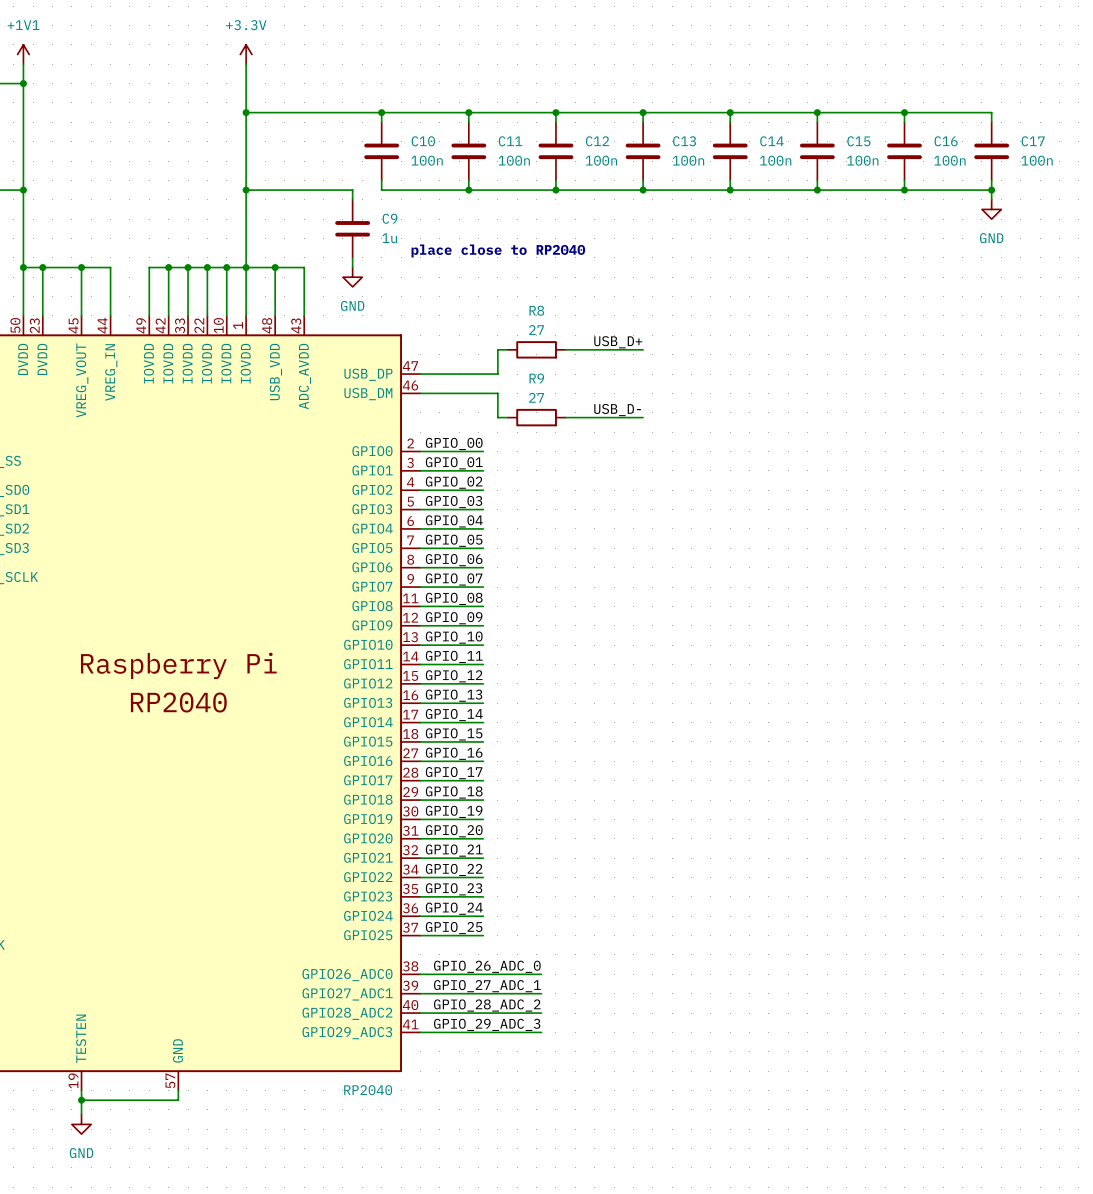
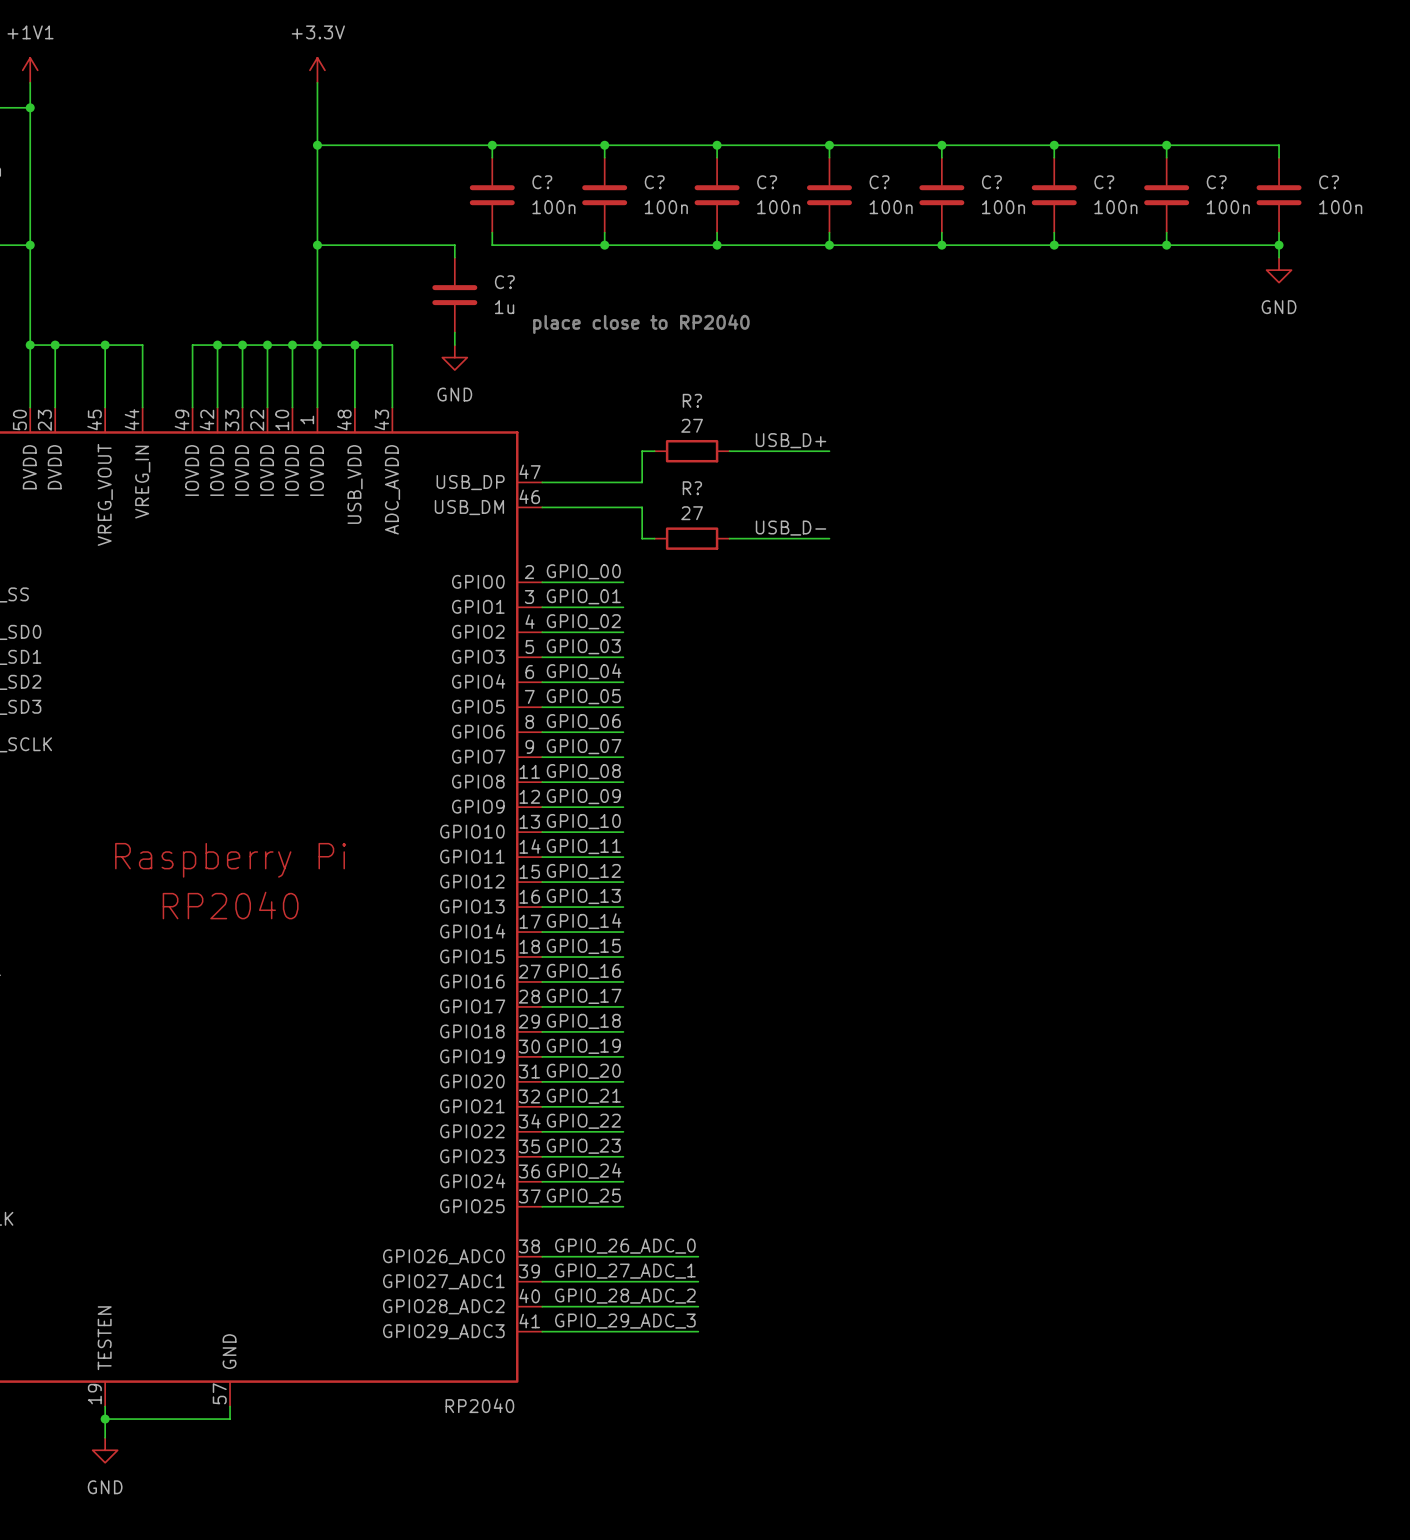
C10 name: C10 (423, 141) -> C? (542, 182)
C11 name: C11 (510, 141) -> C? (654, 182)
C12 name: C12 (597, 141) -> C? (767, 182)
C13 name: C13 (684, 141) -> C? (879, 182)
C14 name: C14 (771, 141) -> C? (991, 182)
C15 name: C15 (858, 141) -> C? (1104, 182)
C16 name: C16 (946, 141) -> C? (1216, 182)
C17 name: C17 (1033, 141) -> C? (1329, 182)
C9 name: C9 (390, 218) -> C? (504, 282)
R8 name: R8 (536, 310) -> R? (692, 400)
R9 name: R9 (536, 378) -> R? (692, 488)

